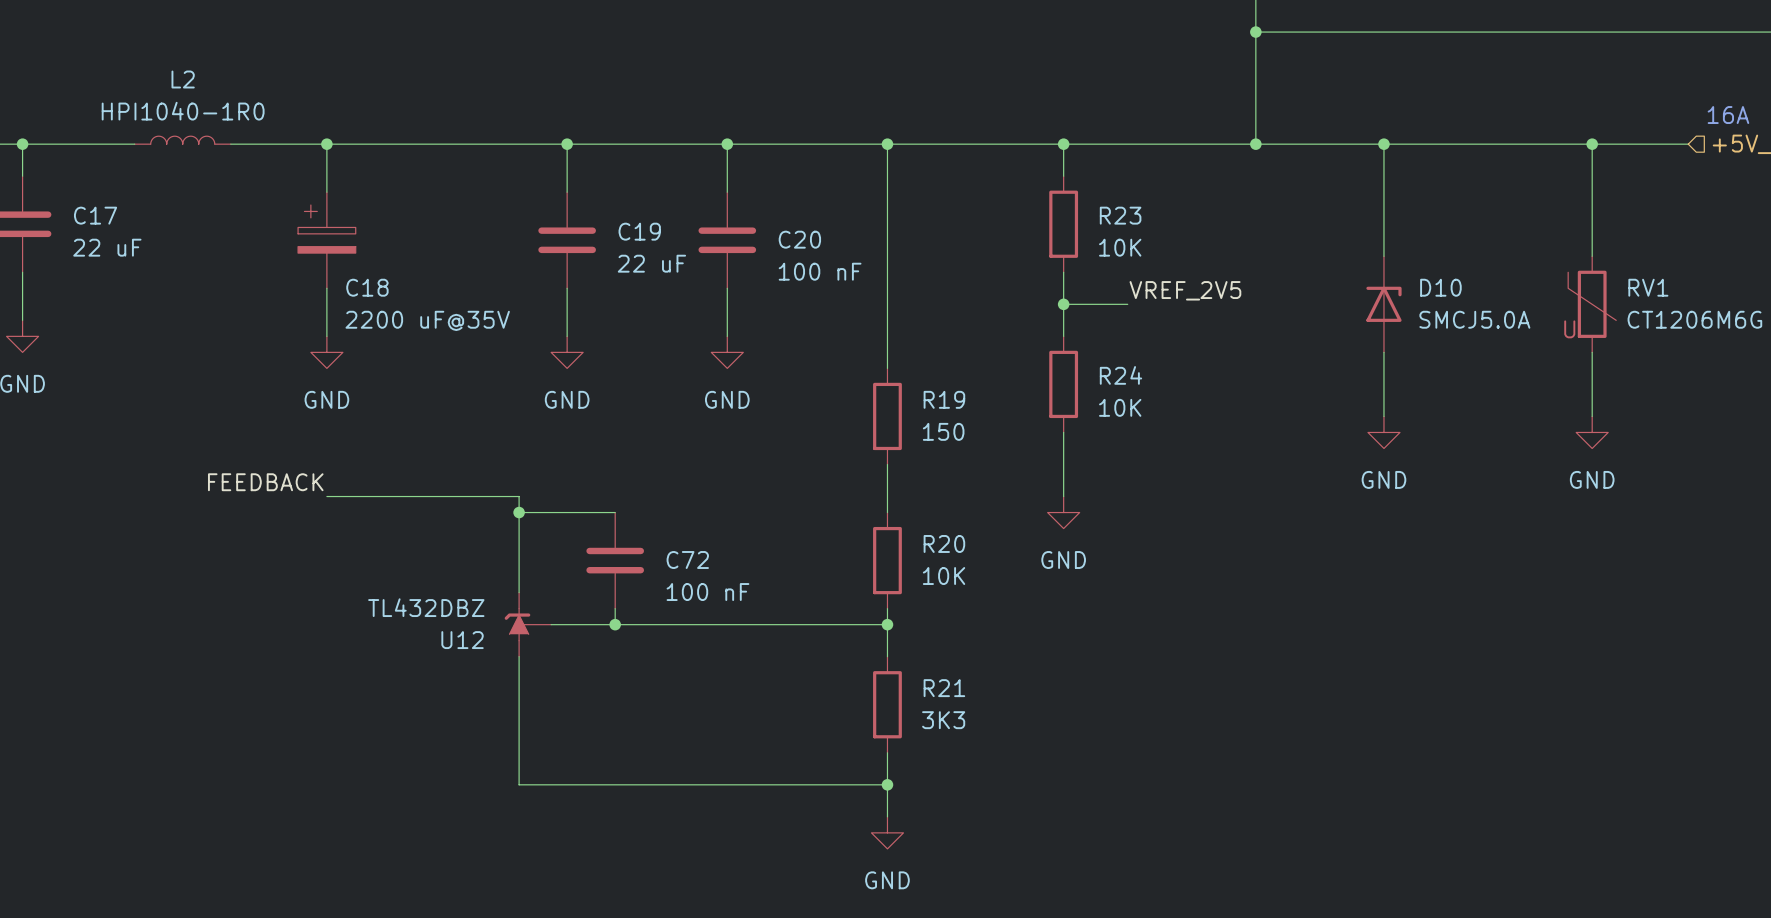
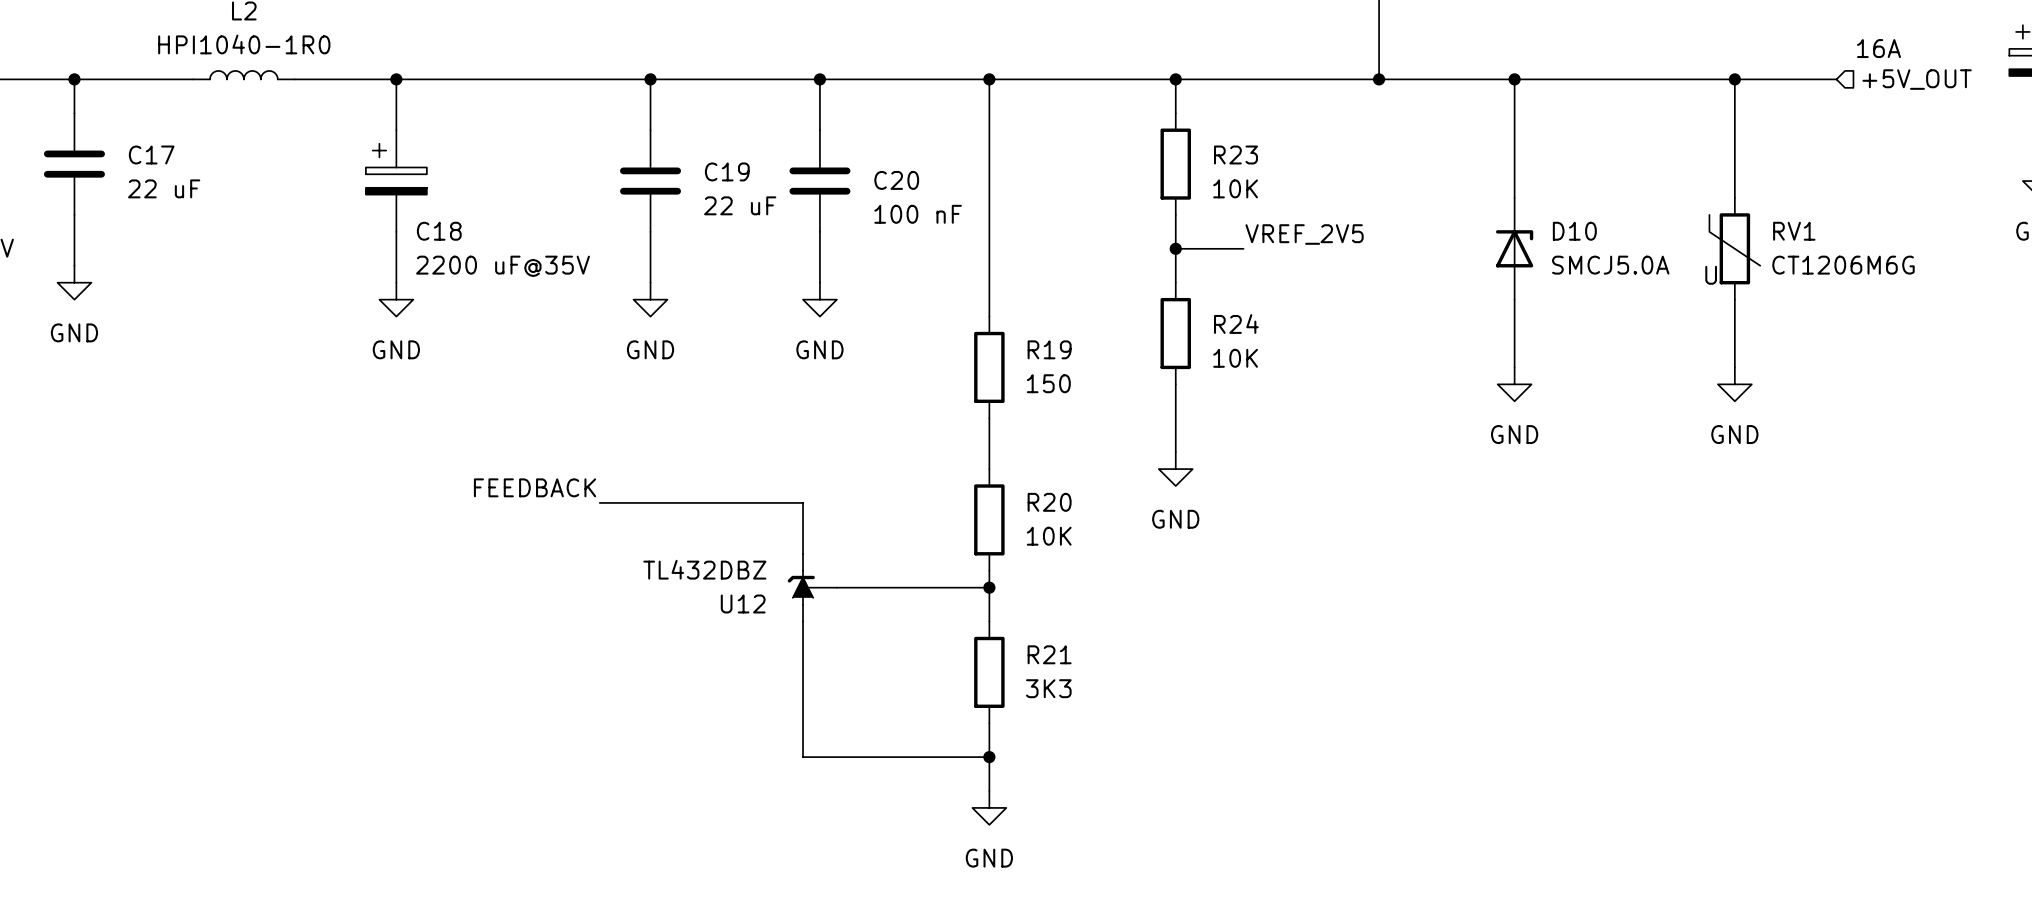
label position: FEEDBACK (265, 482) -> FEEDBACK (535, 487)
wire: (326, 496) (519, 496) (519, 592) -> none
wire: (519, 512) (615, 512) -> none
junction: (519, 512) -> none
wire: none -> (599, 502) (803, 502) (803, 553)
C72: 100 nF (615, 560) -> none
wire: (615, 608) (615, 624) -> none
U12 position: (527, 624) -> (812, 587)
wire: (551, 624) (743, 624) -> none
junction: (615, 624) -> none
wire: (519, 656) (519, 784) (711, 784) -> (803, 621) (803, 757)

